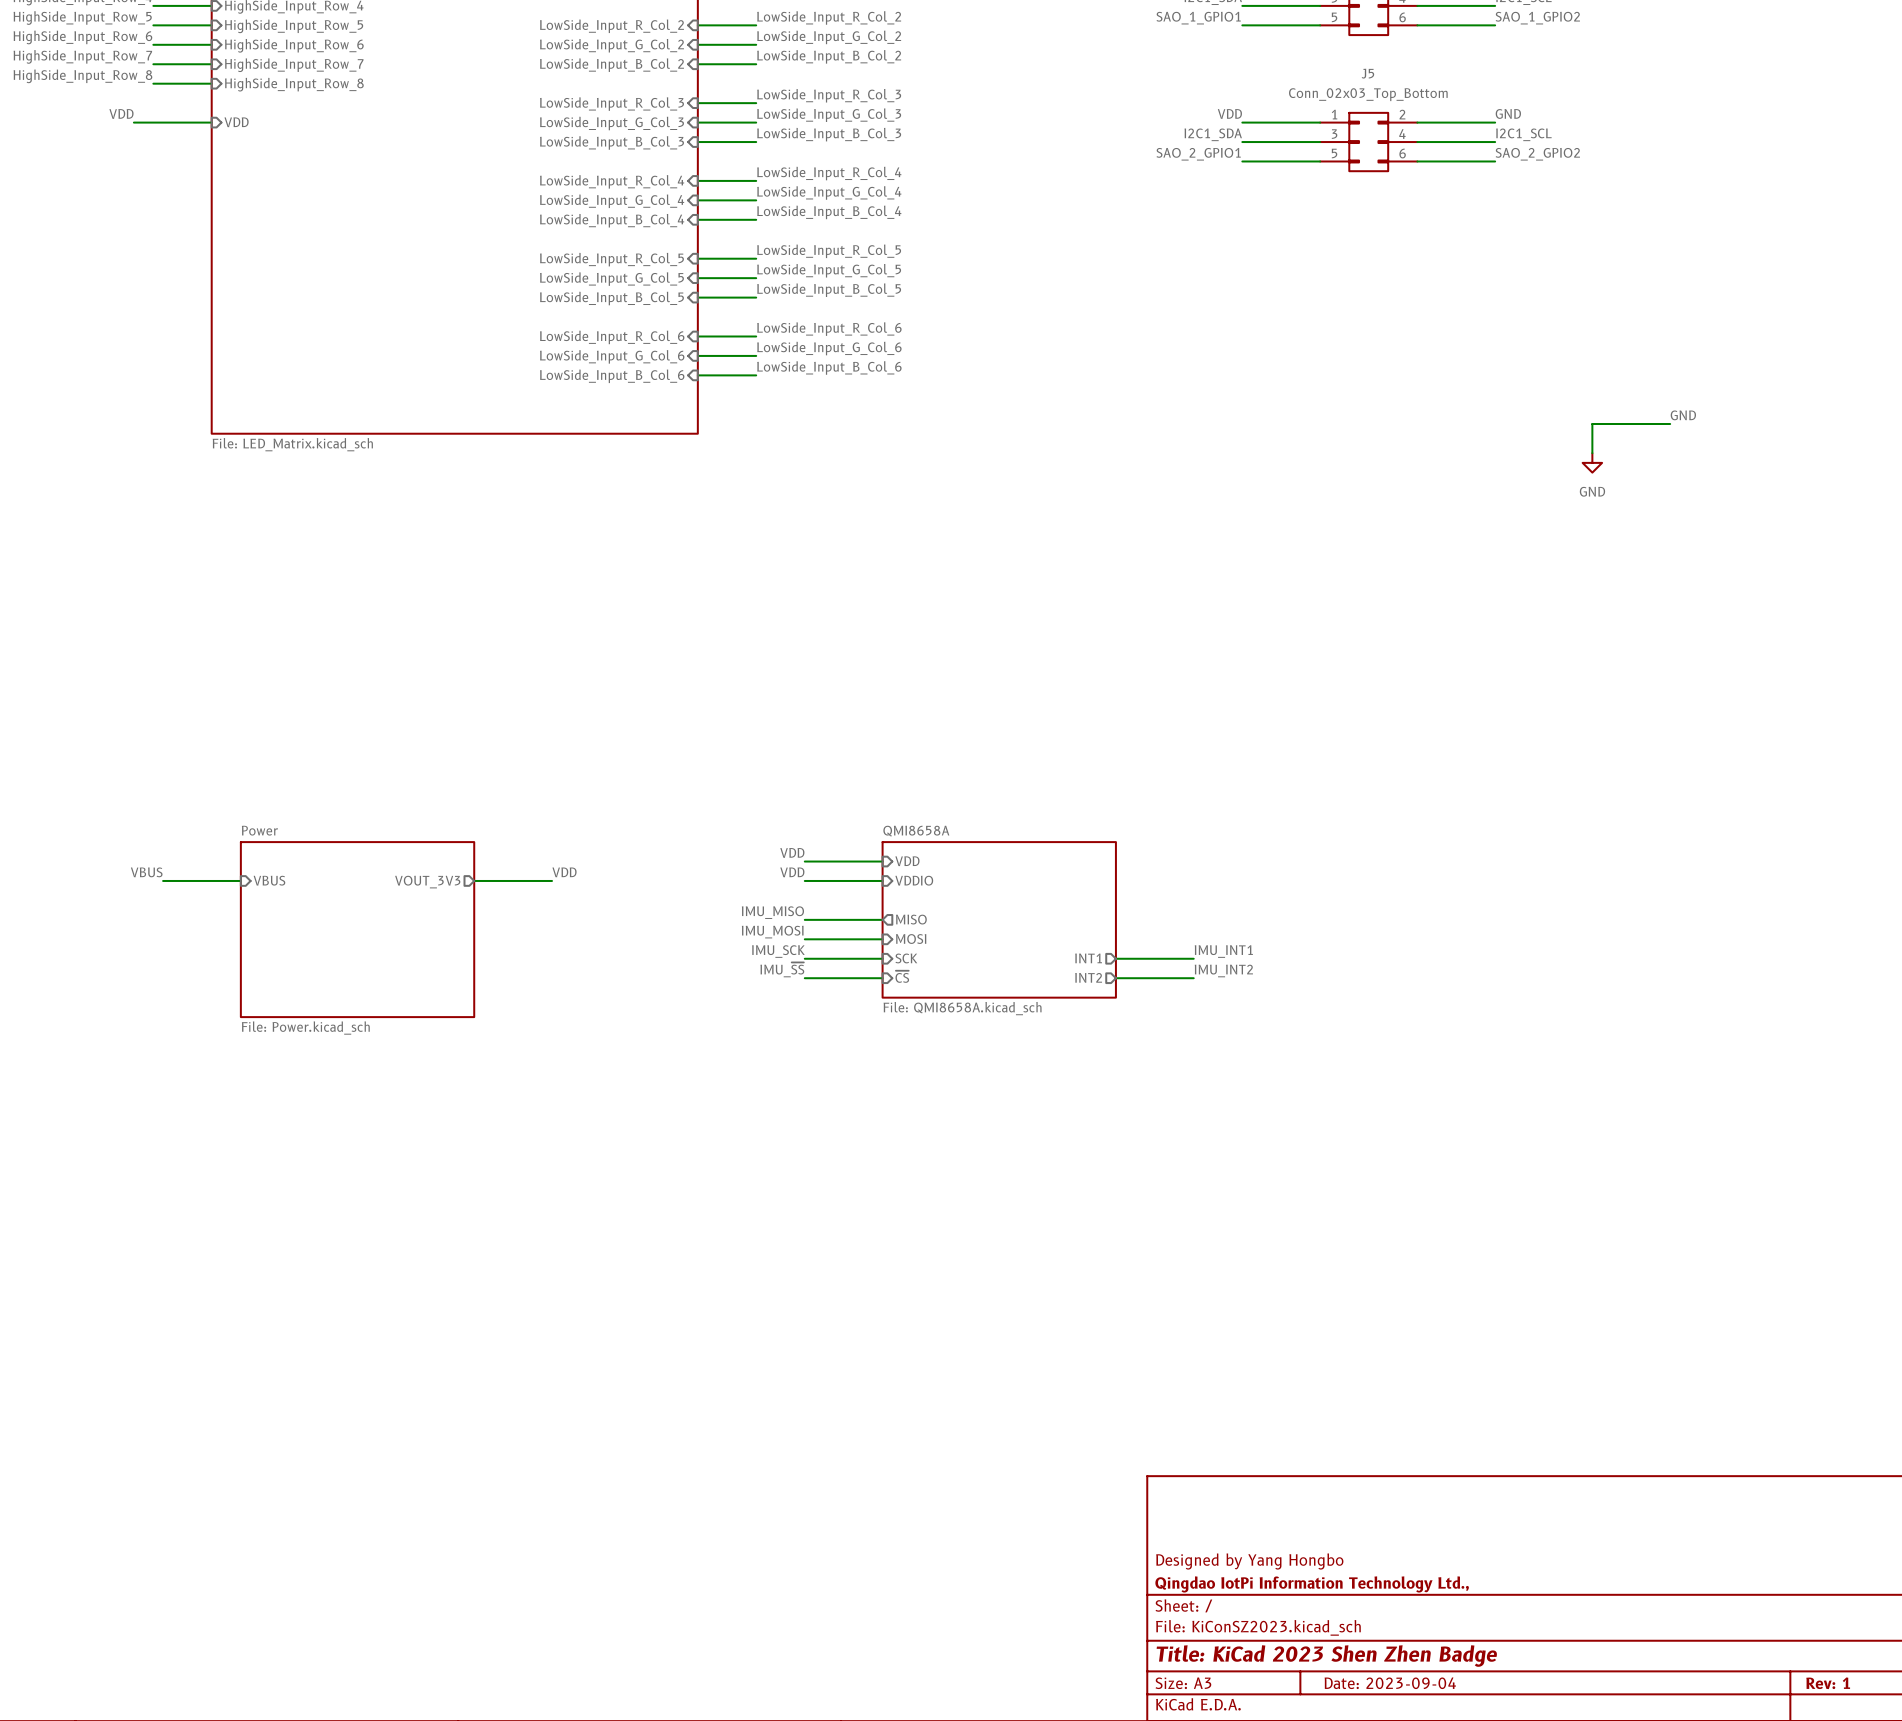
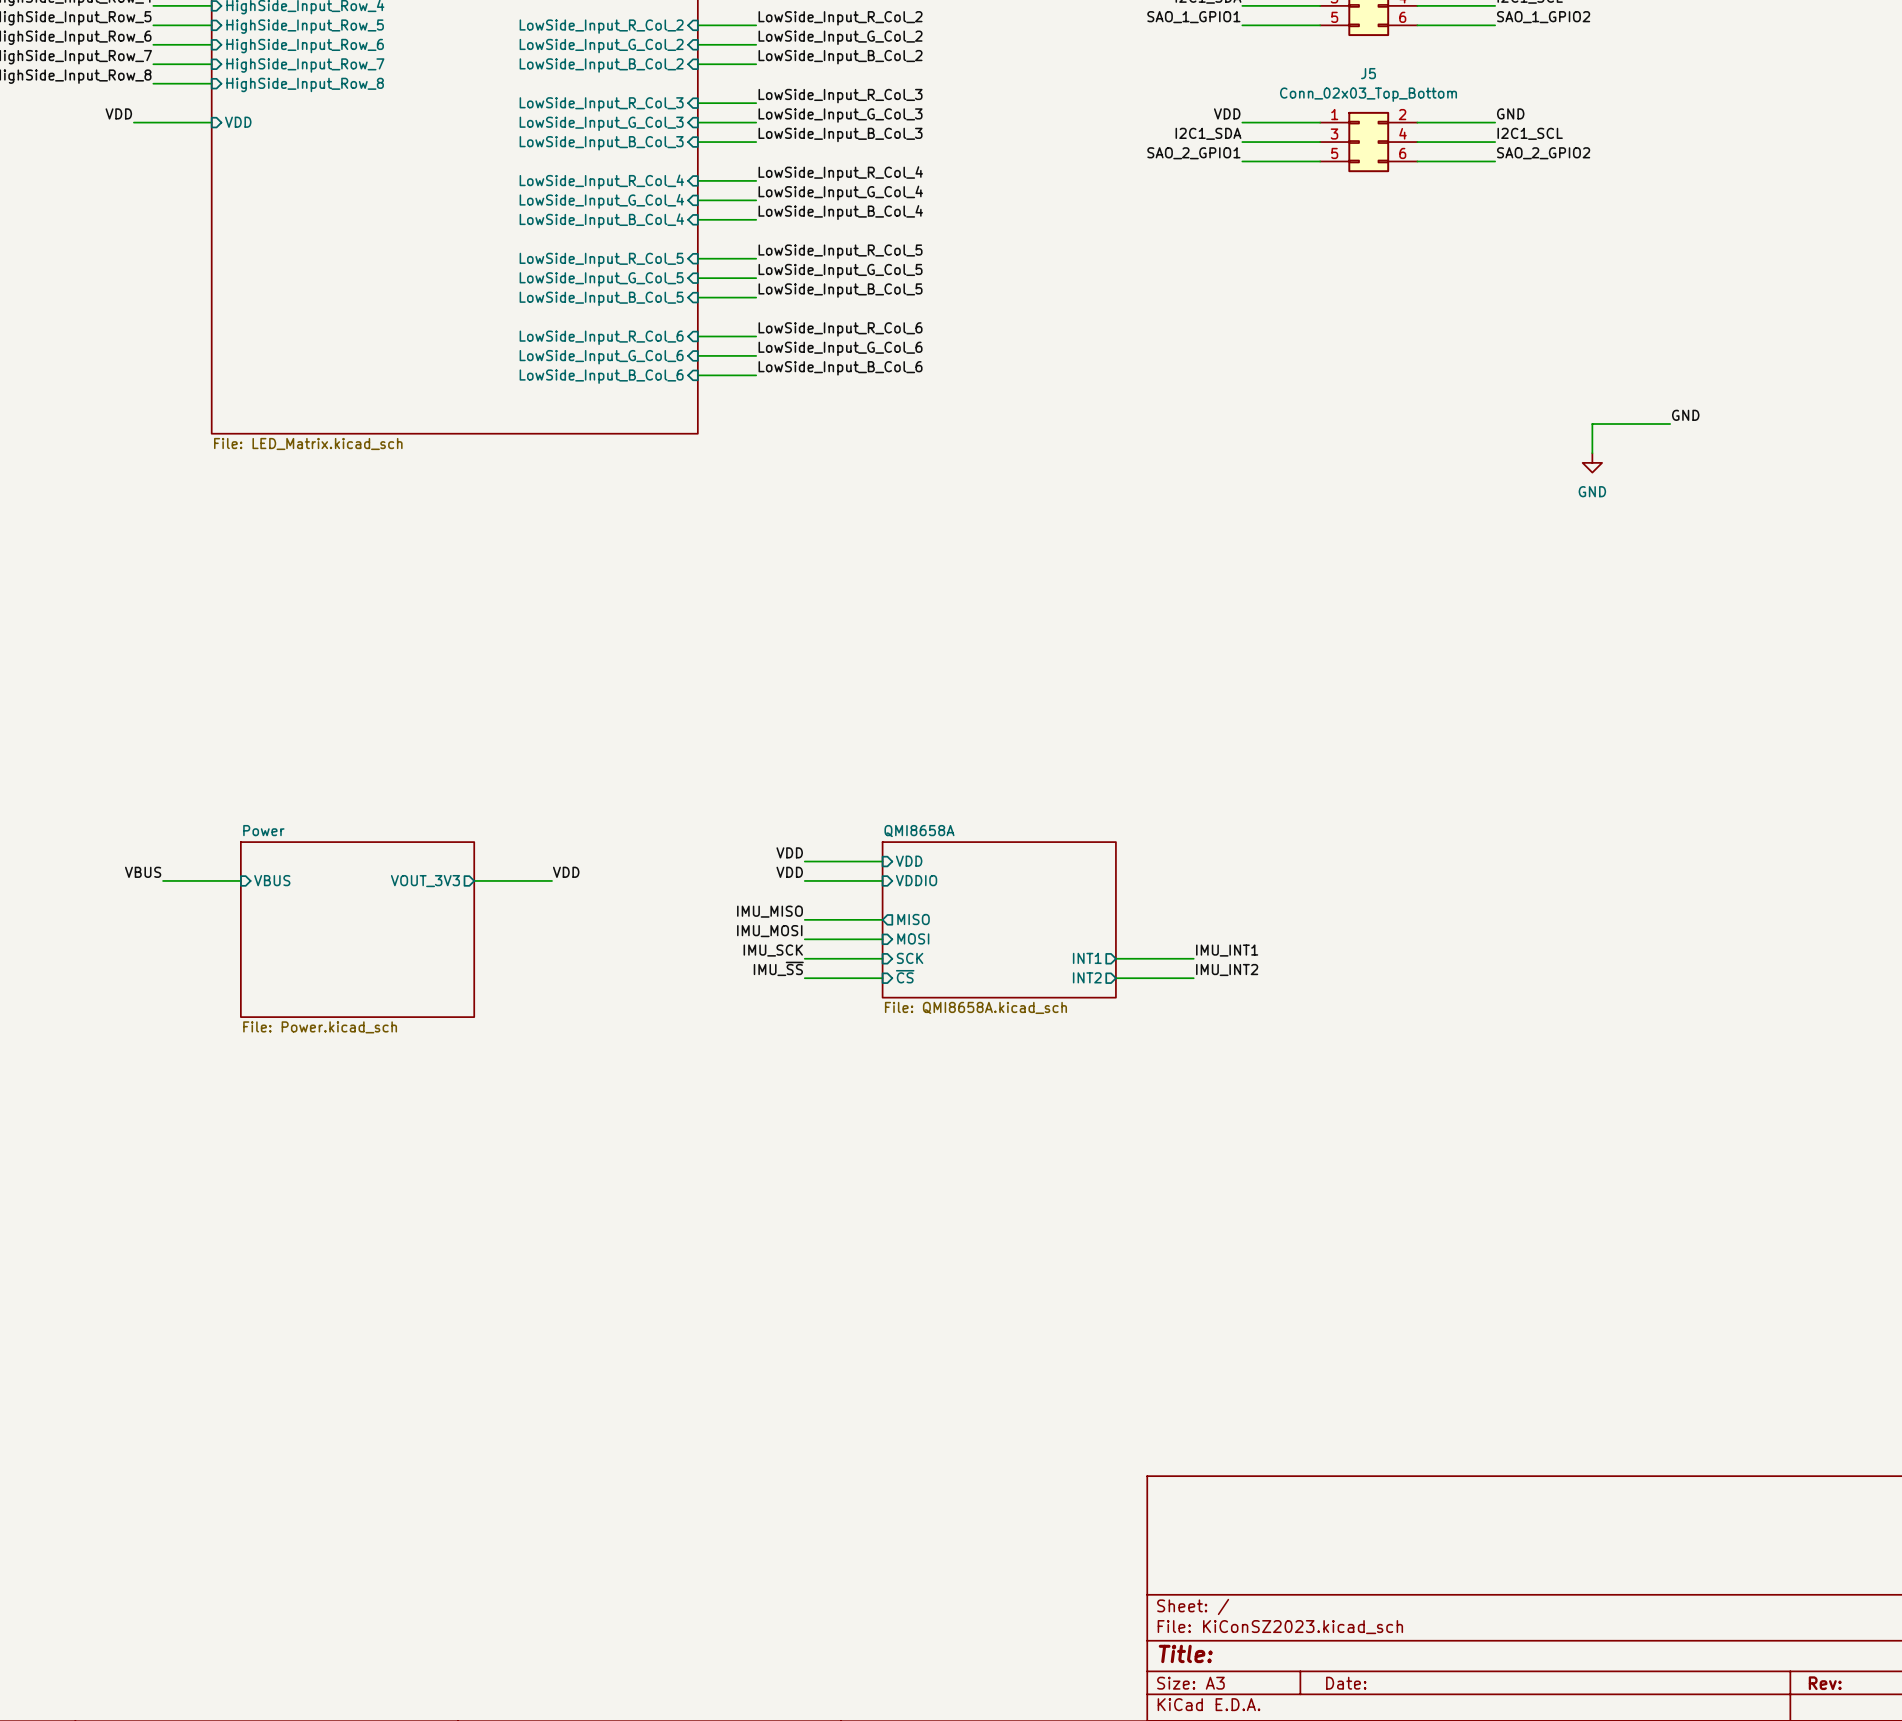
title block: Designed by Yang Hongbo (1249, 1561) -> none
title block: Qingdao IotPi Information Technology Ltd., (1312, 1584) -> none
title block: Title: KiCad 2023 Shen Zhen Badge (1326, 1656) -> Title: (1185, 1653)
title block: Date: 2023-09-04 (1390, 1683) -> Date: (1346, 1683)
title block: Rev: 1 (1828, 1683) -> Rev: (1825, 1683)

